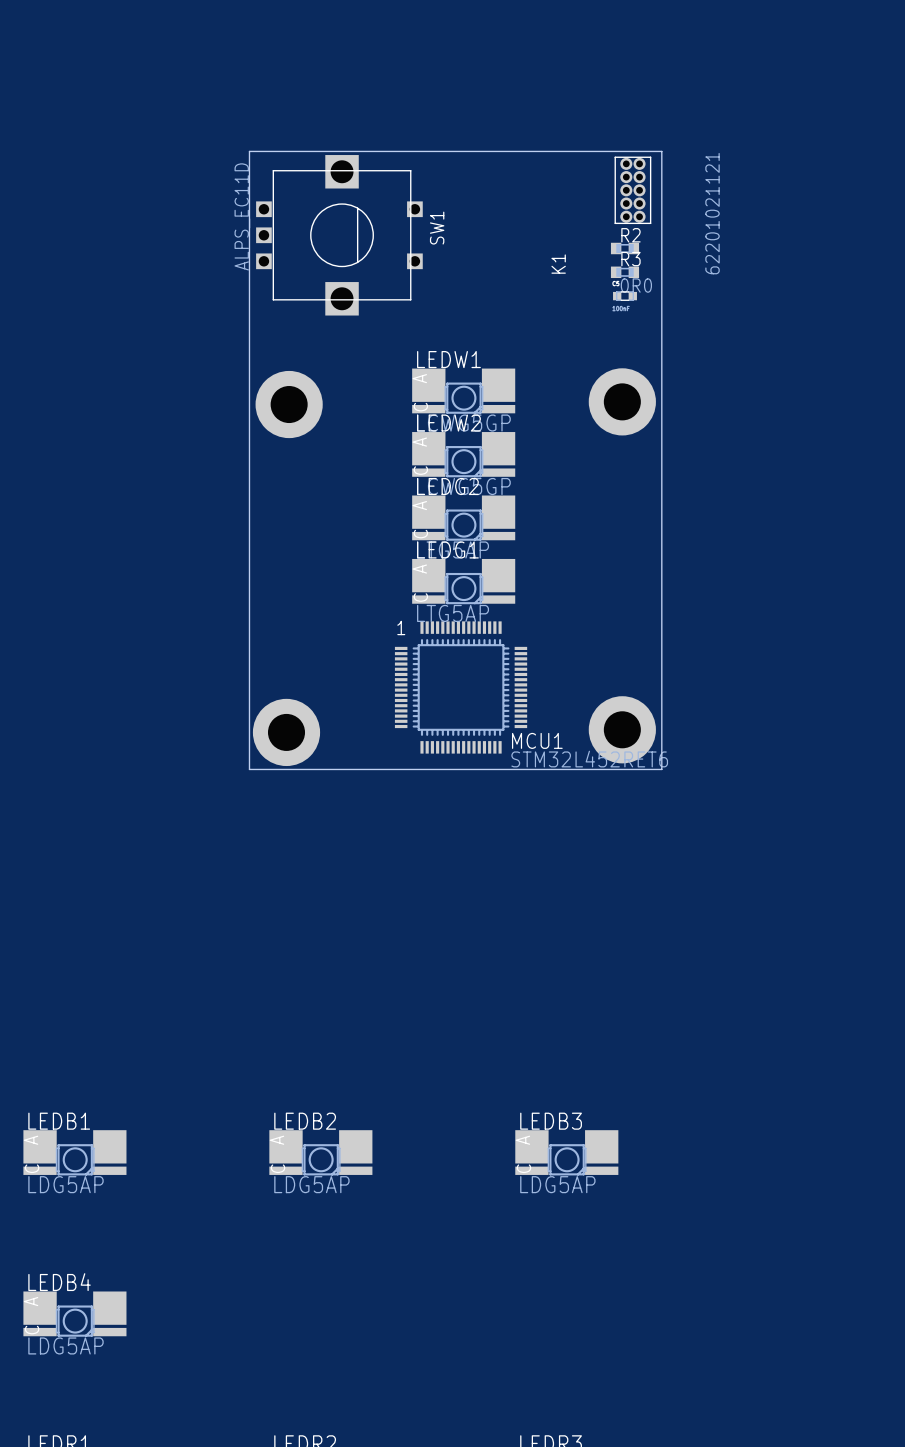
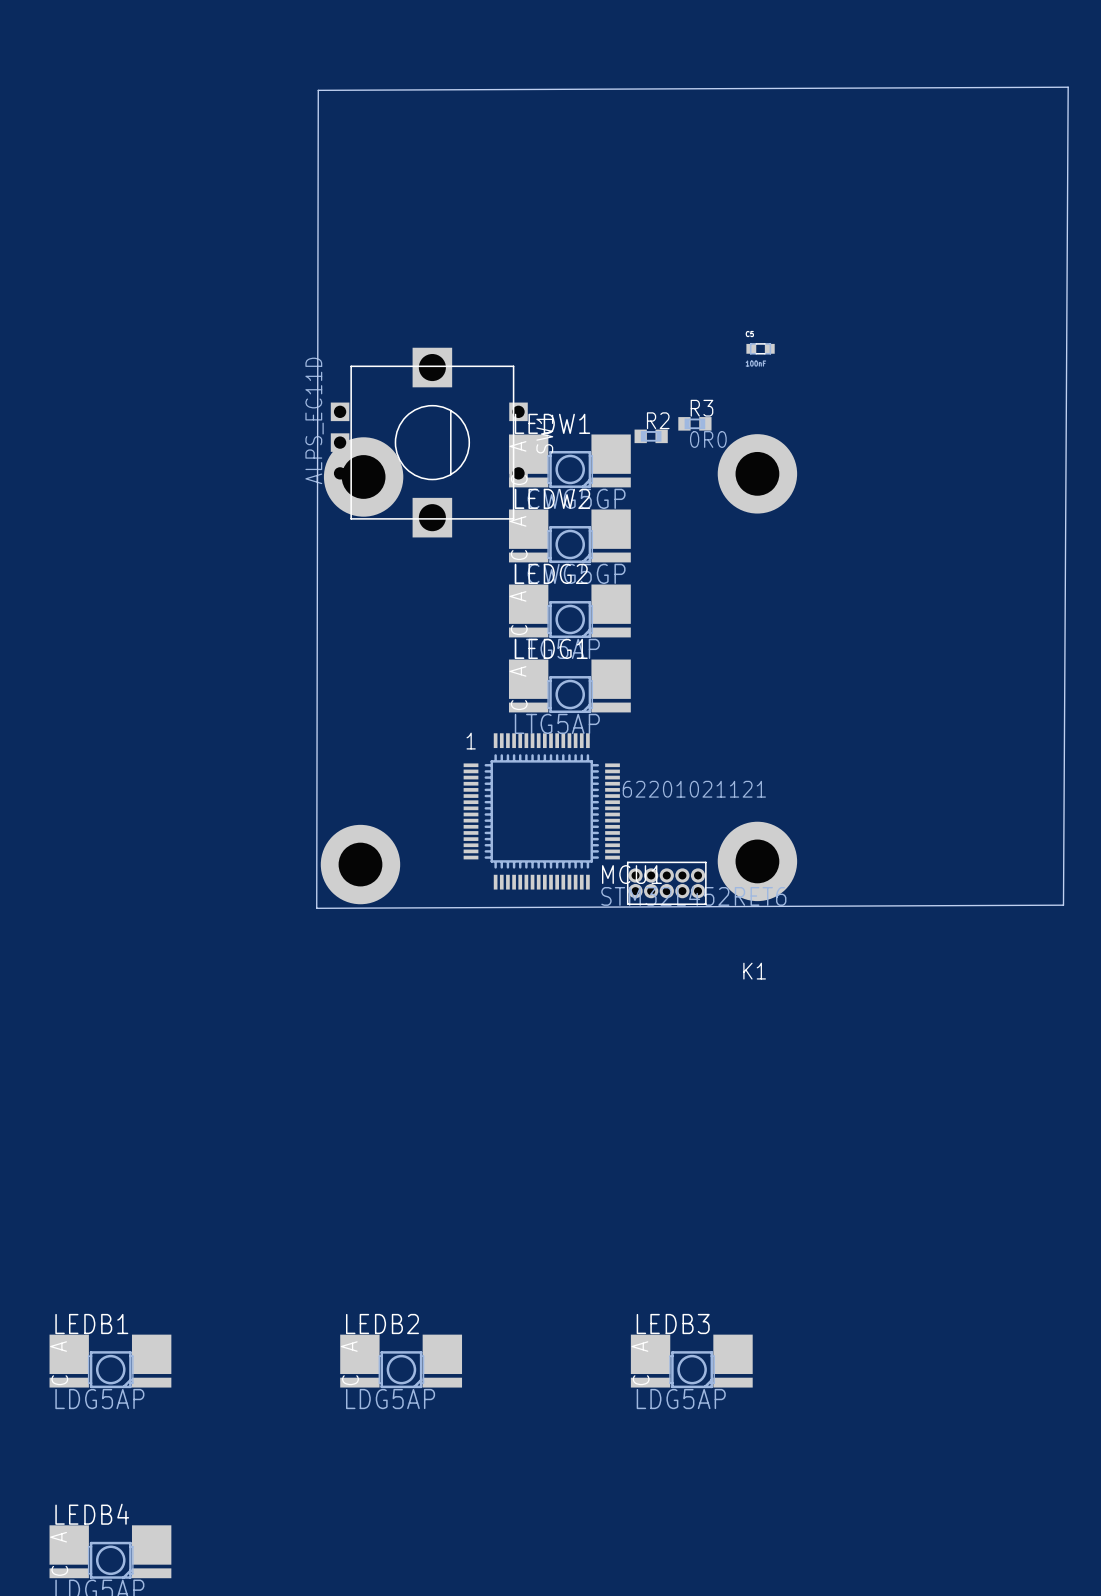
board edge: (249, 151) (661, 151) (661, 769) (249, 769) (249, 151) -> (1068, 87) (318, 90) (316, 908) (1063, 905) (1068, 87)
K1 rotation: 0° (632, 190) -> 90° clockwise (666, 883)
K1 position: (632, 190) -> (666, 883)
K1 value position: 62201021121 (712, 213) -> 62201021121 (694, 789)
SW1 position: (339, 235) -> (429, 442)
R2 position: (625, 248) -> (651, 436)
K1 name position: K1 (558, 264) -> K1 (754, 971)
R3 position: (625, 272) -> (694, 423)
MCU1 position: (461, 687) -> (541, 811)

